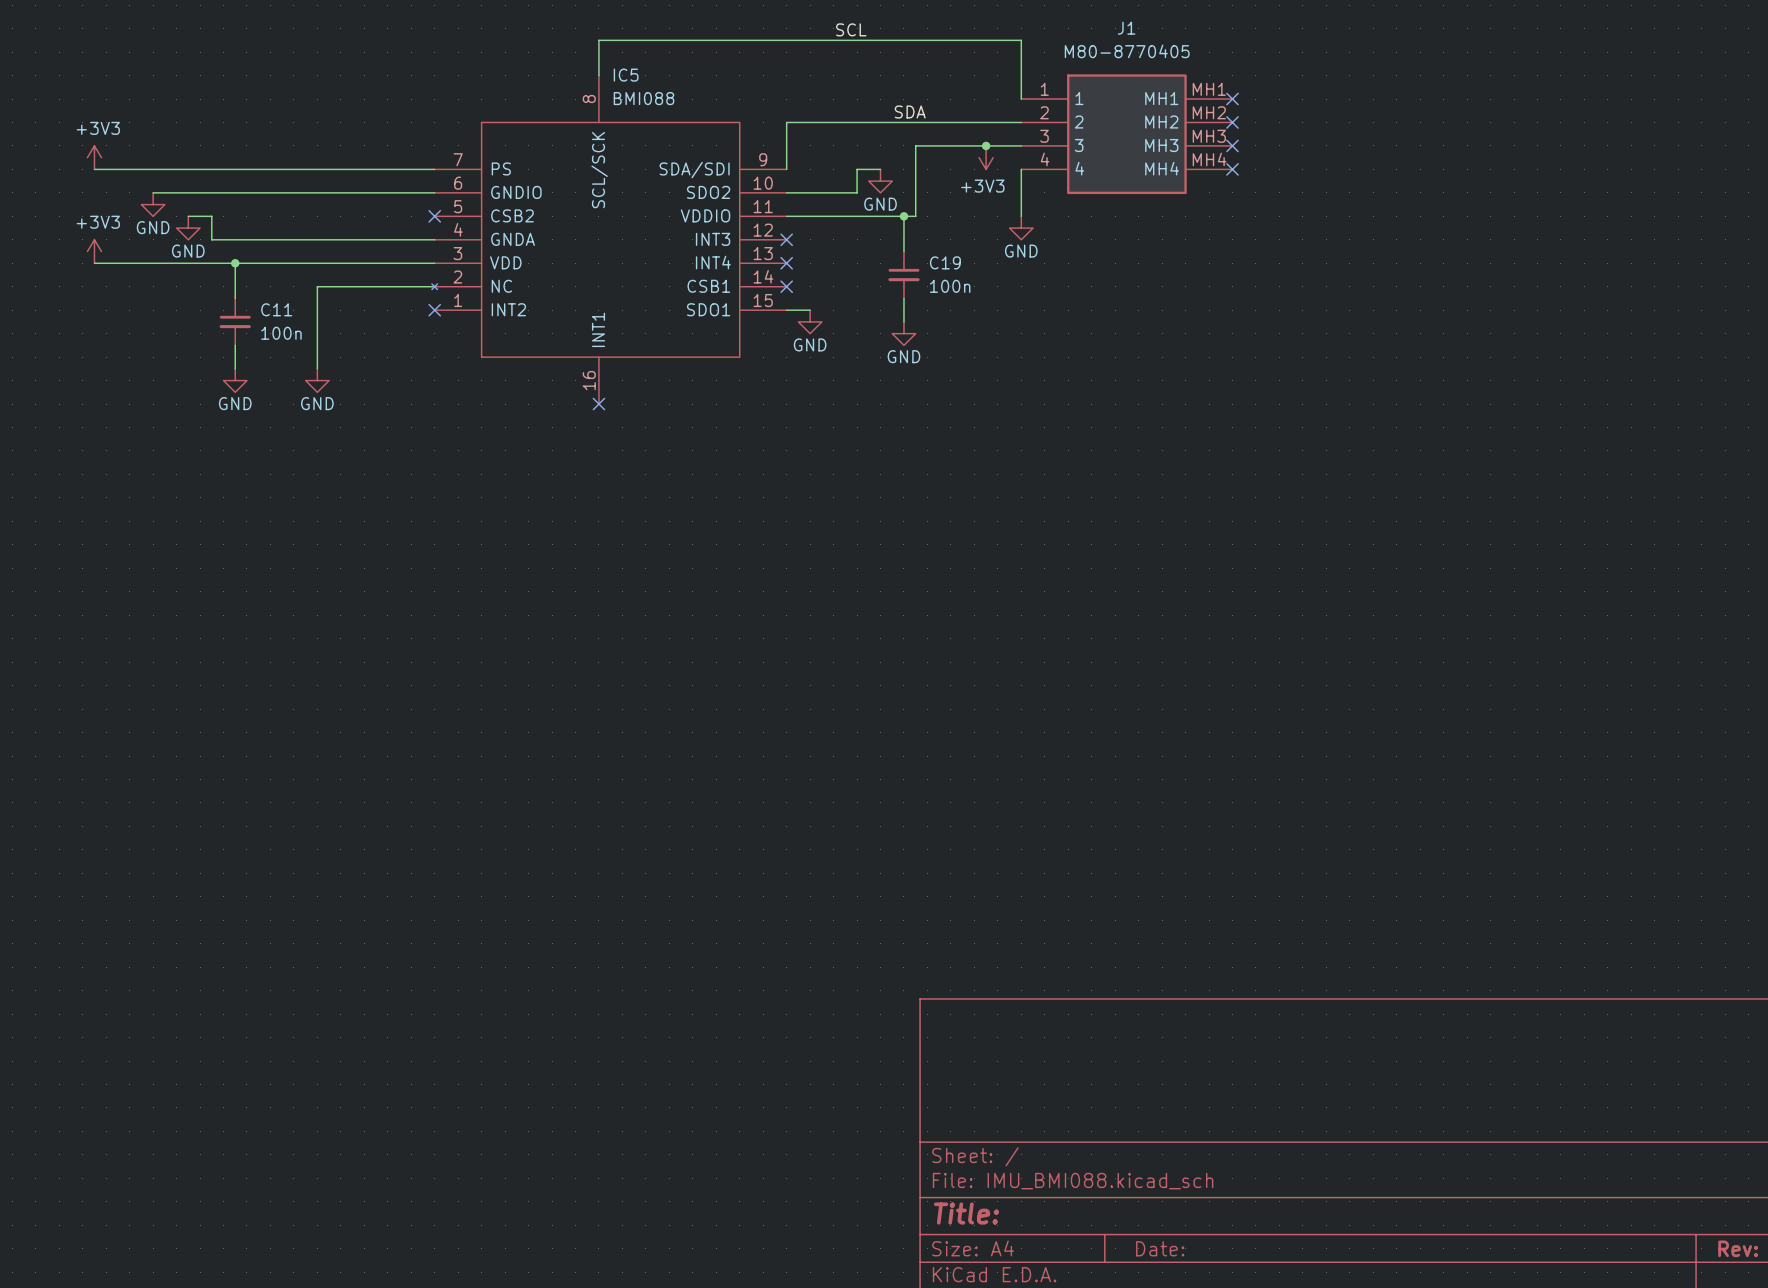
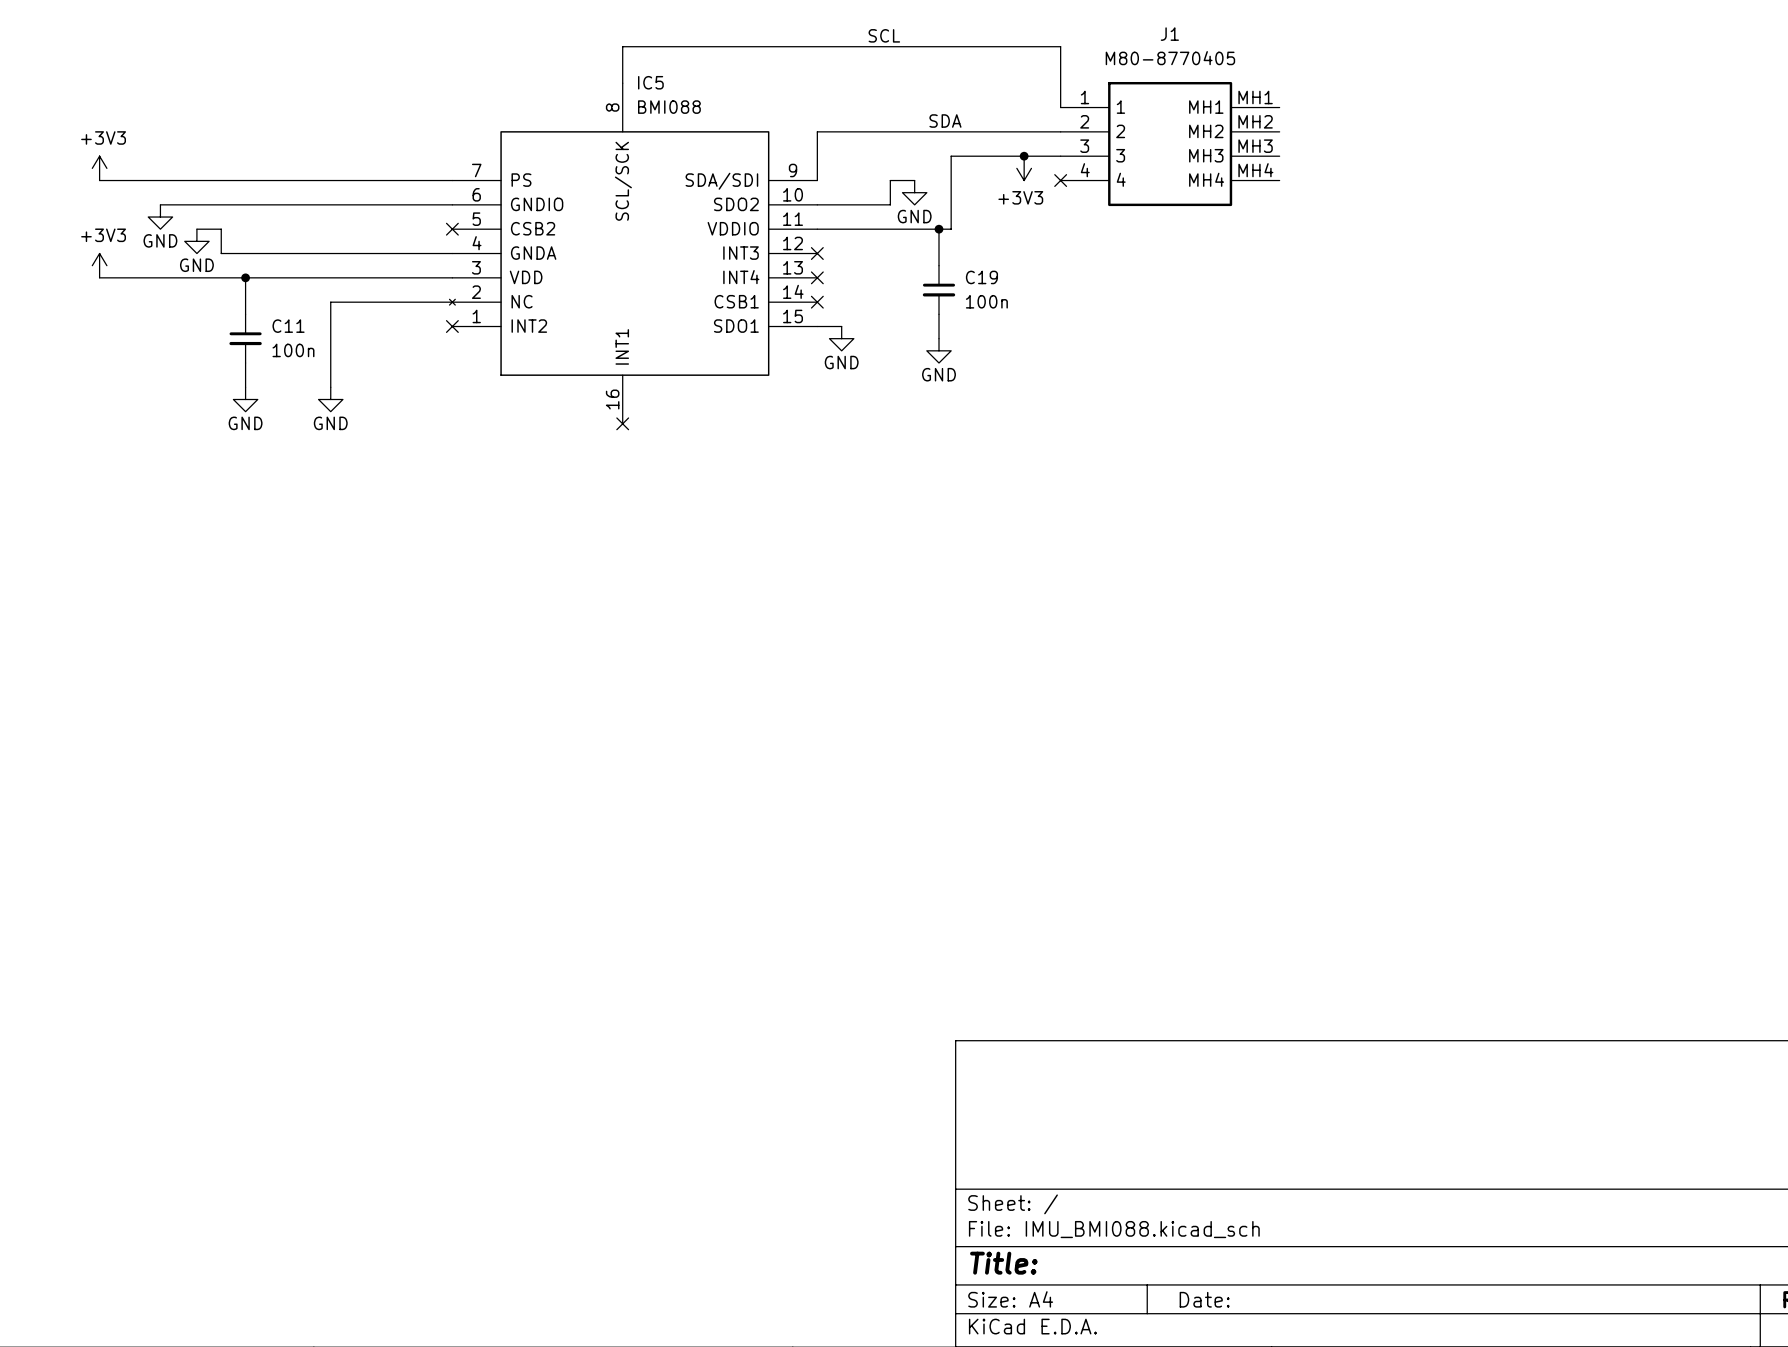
no-connect mark: (1232, 99) -> none
no-connect mark: (1232, 122) -> none
no-connect mark: (1232, 145) -> none
wire: (1021, 169) (1021, 216) -> none
no-connect mark: none -> (1060, 180)
no-connect mark: (1232, 169) -> none
power symbol: GND (1021, 228) -> none

